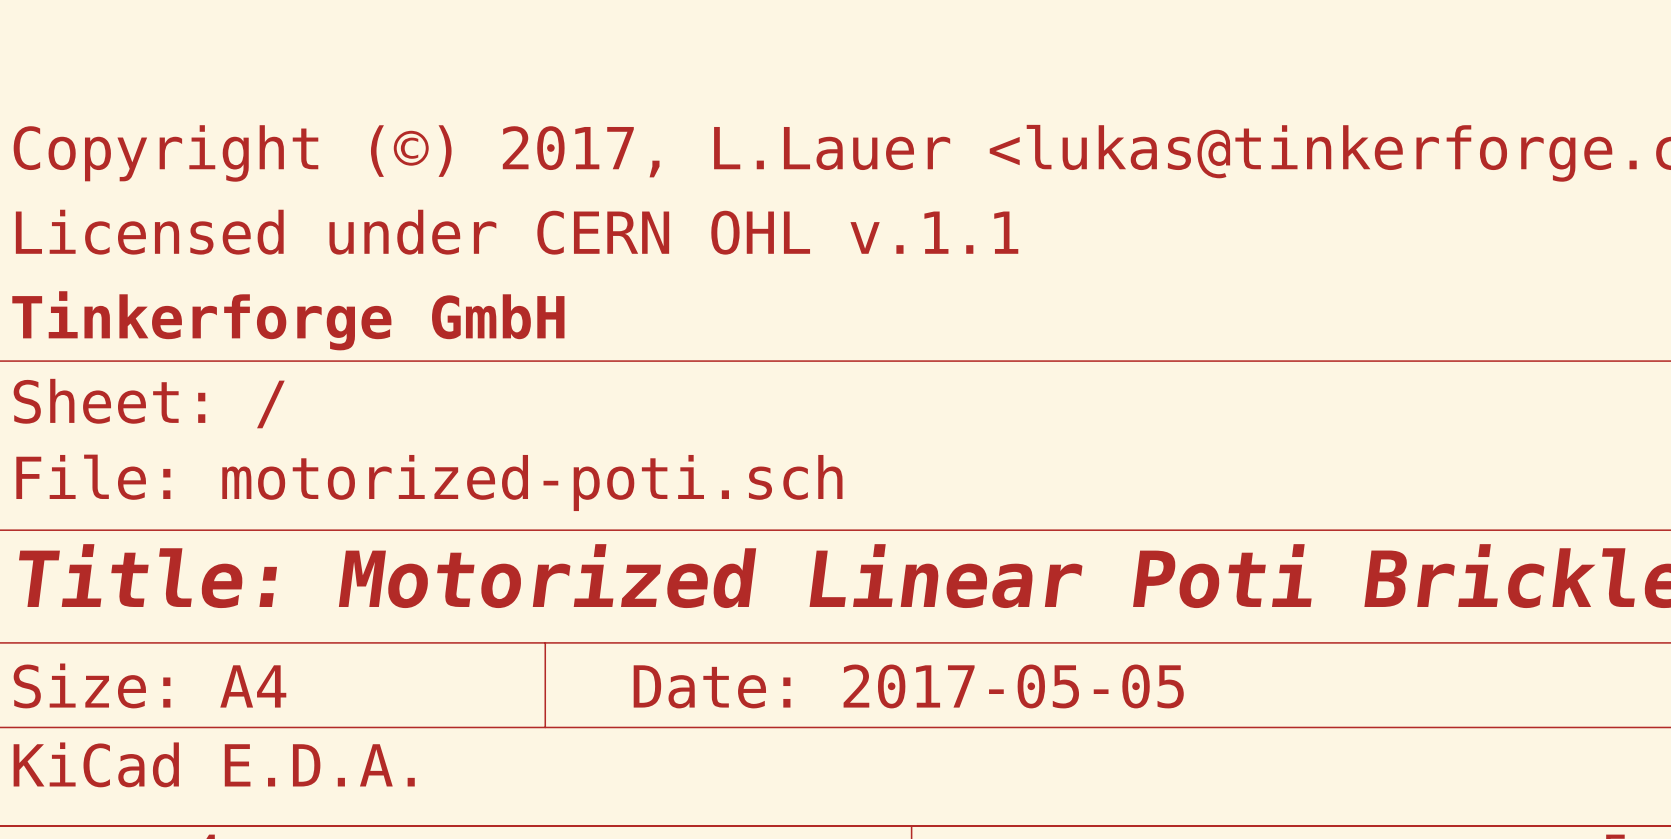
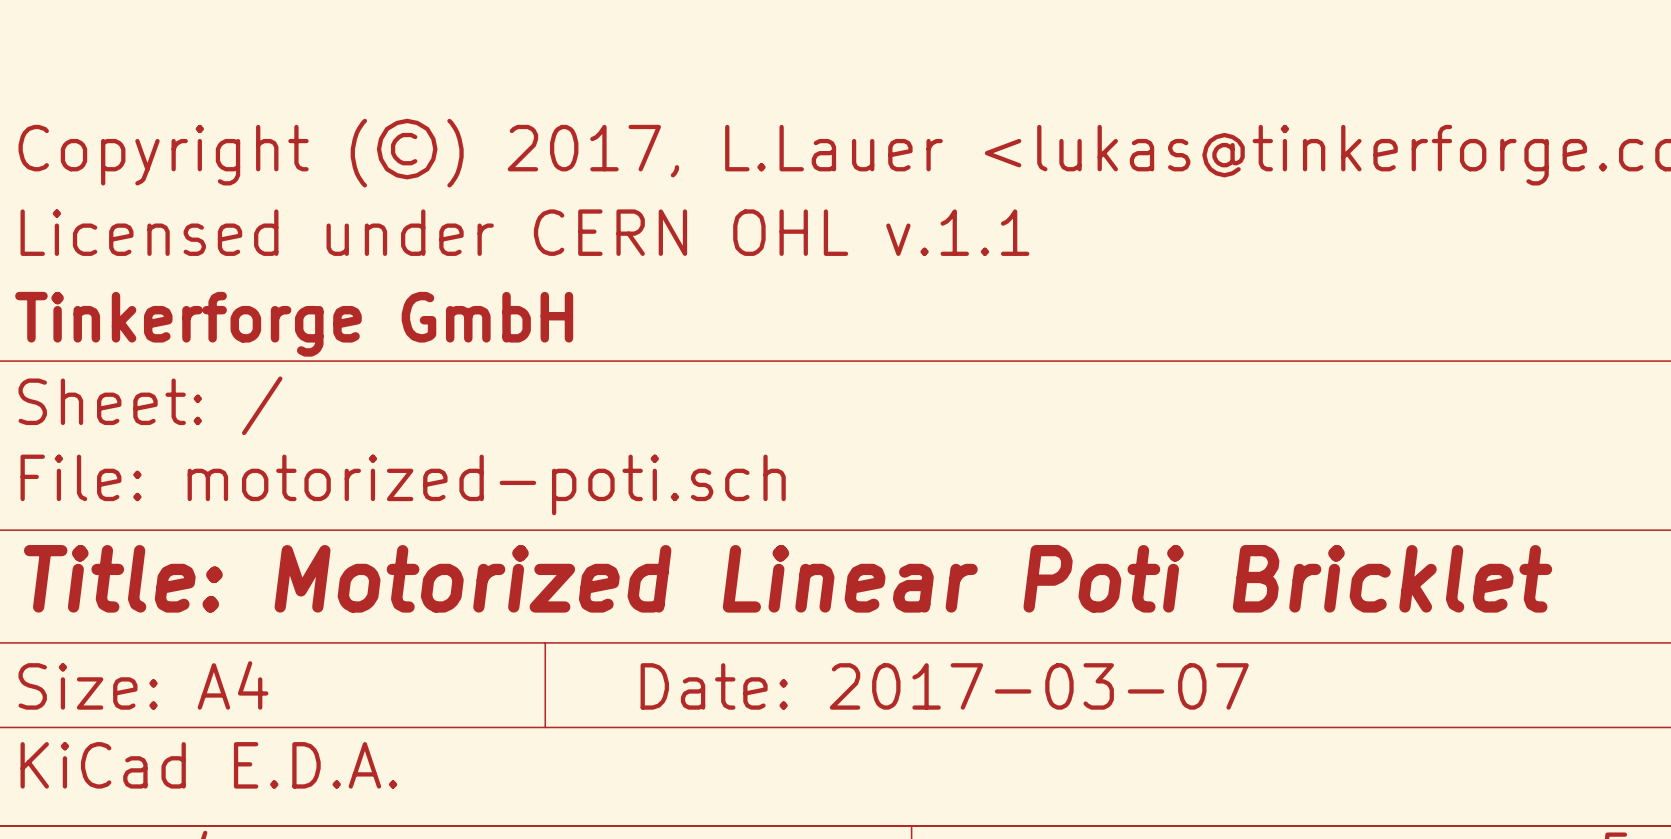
title block: Date: 2017-05-05 (908, 686) -> Date: 2017-03-07 (944, 686)

